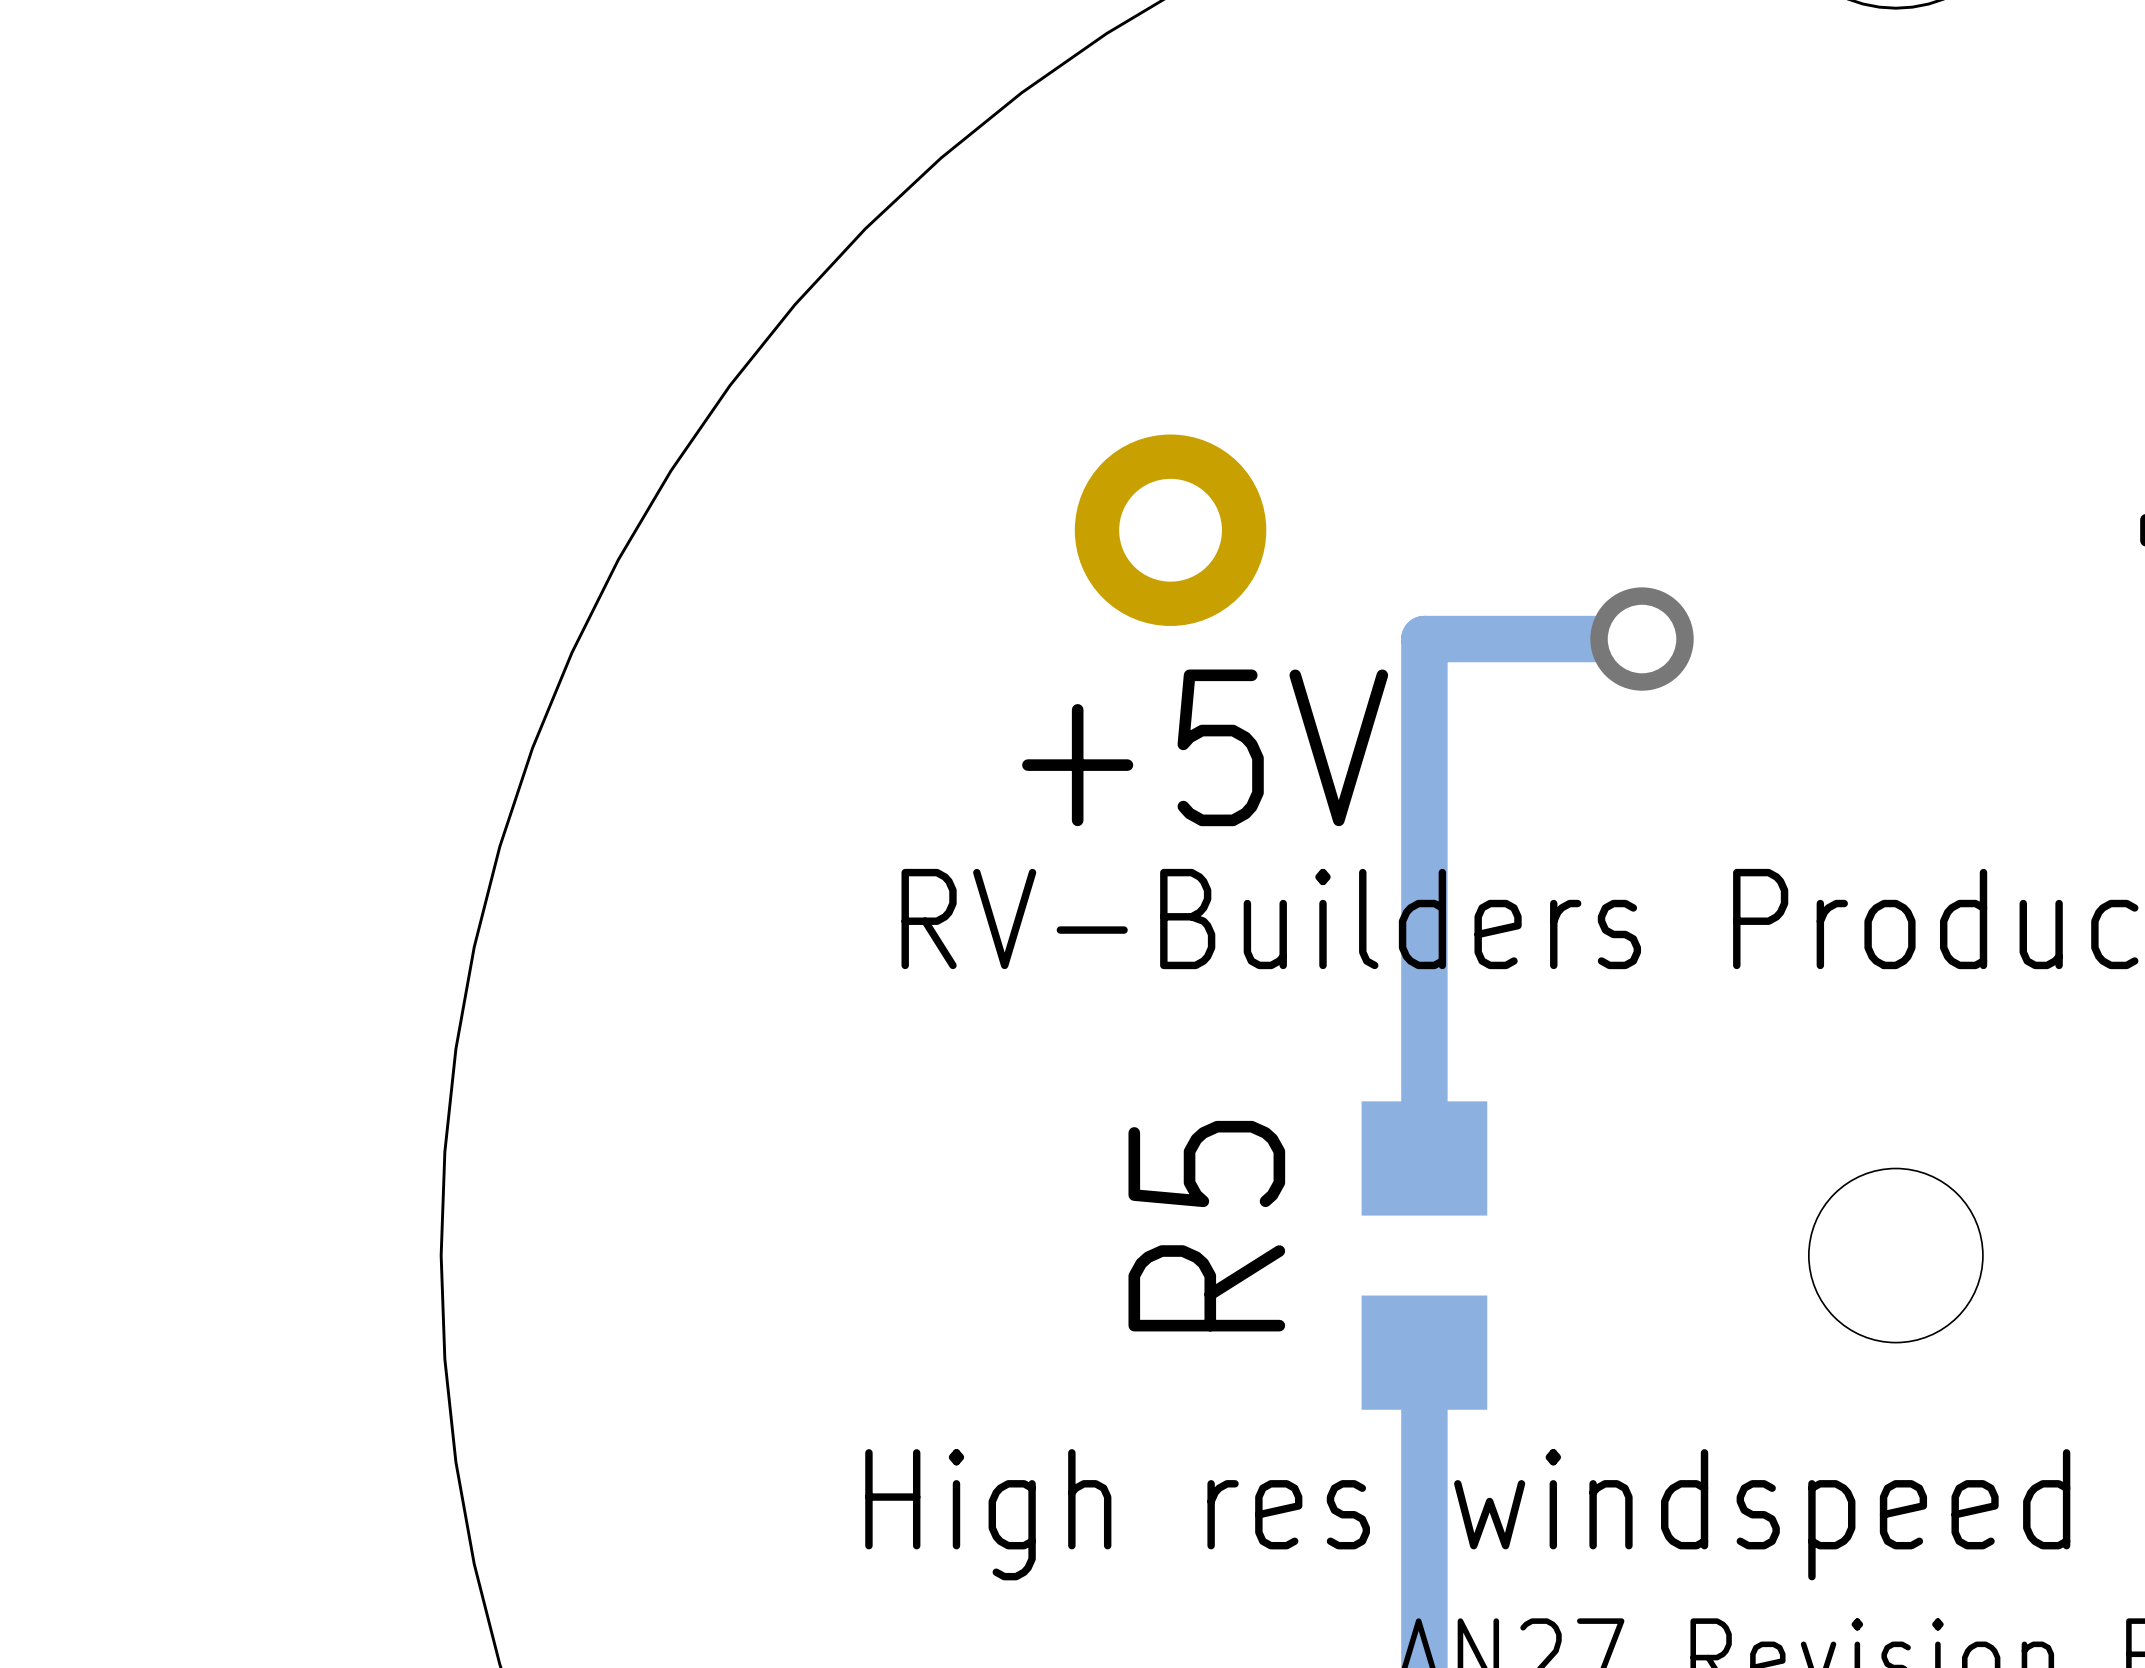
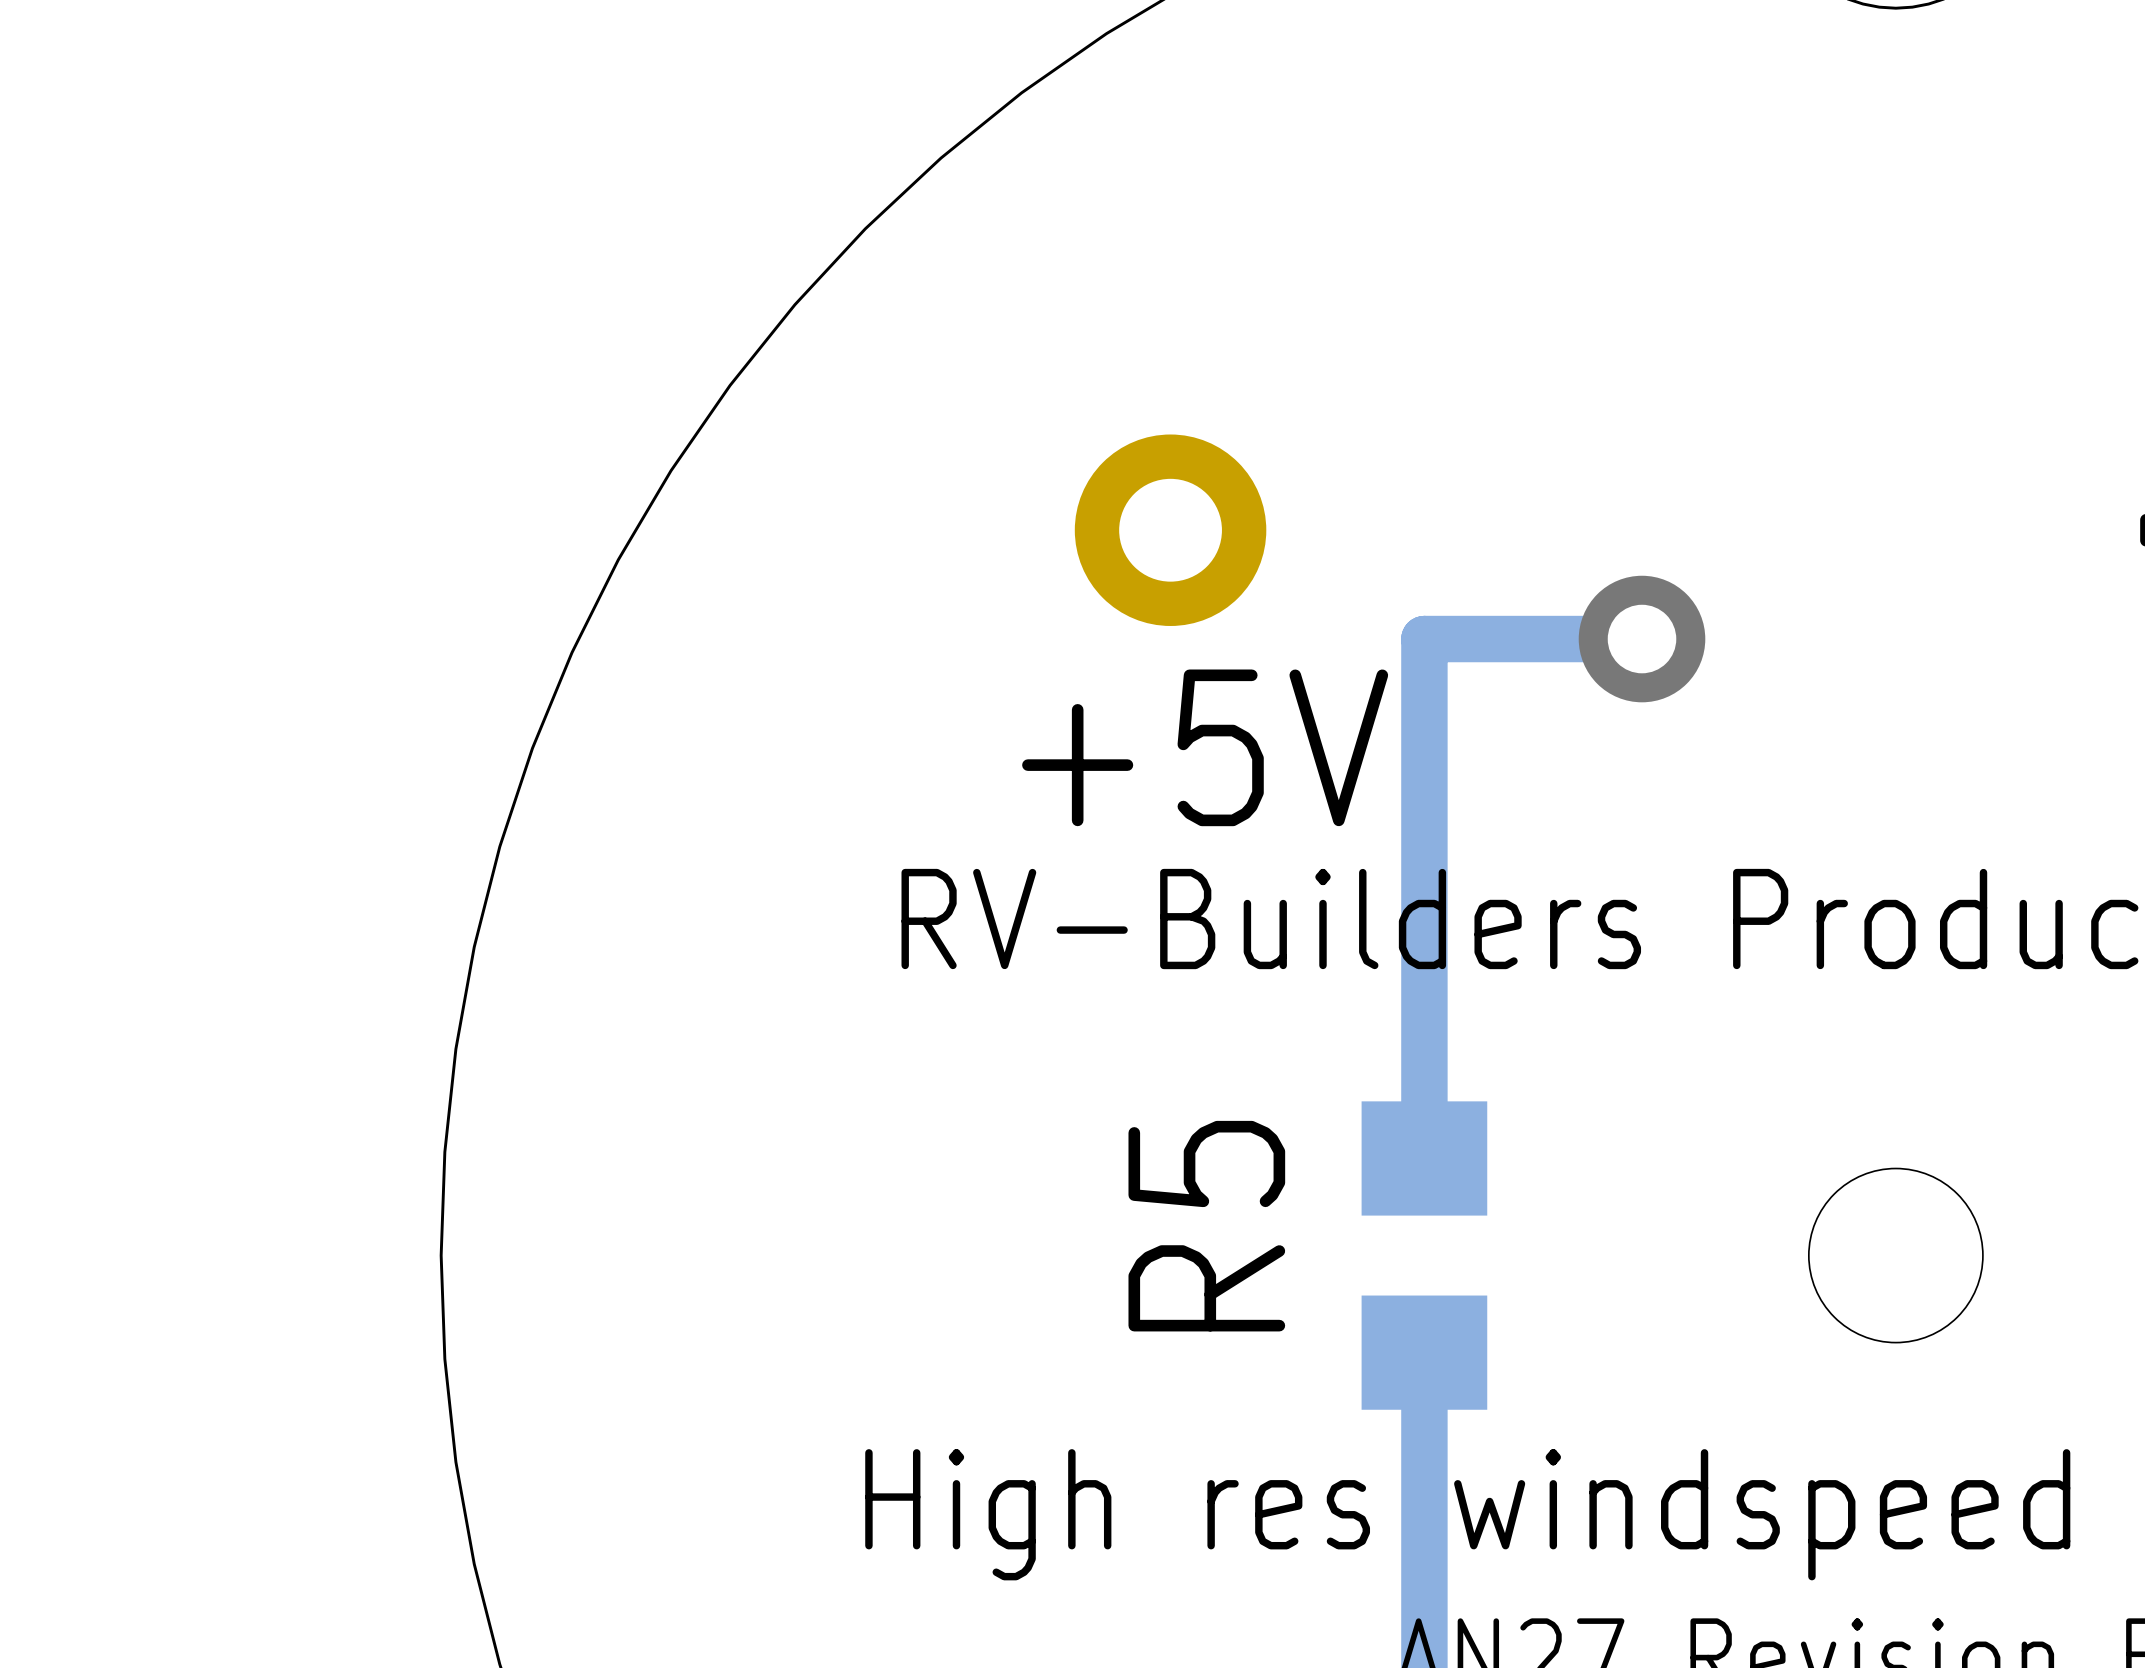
via size: [1590, 587, 1694, 691] -> [1578, 575, 1706, 703]

